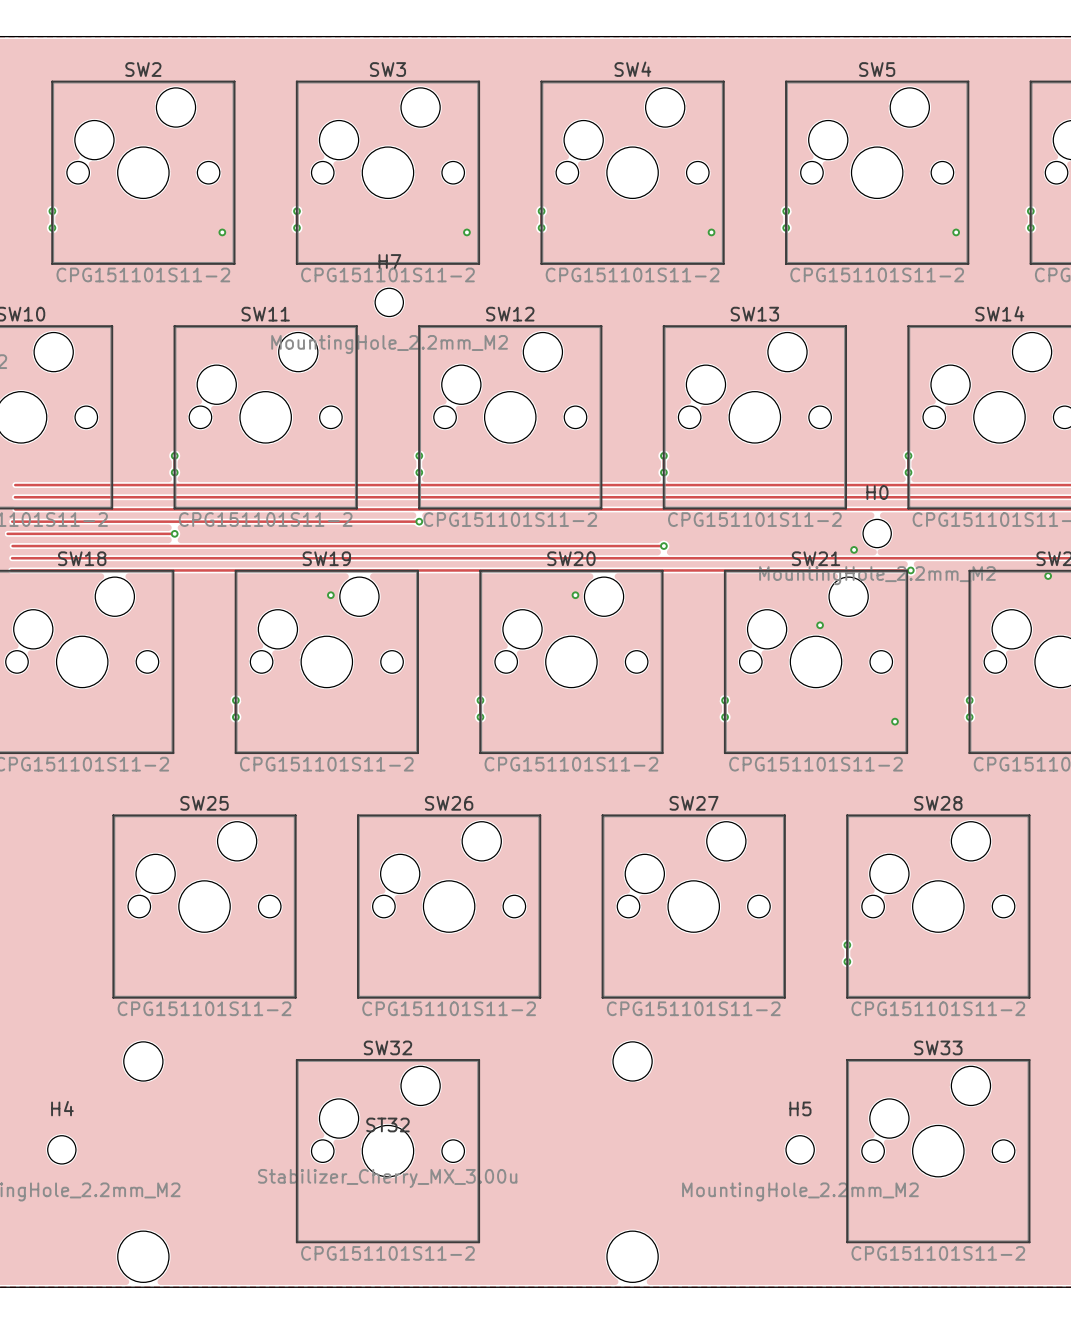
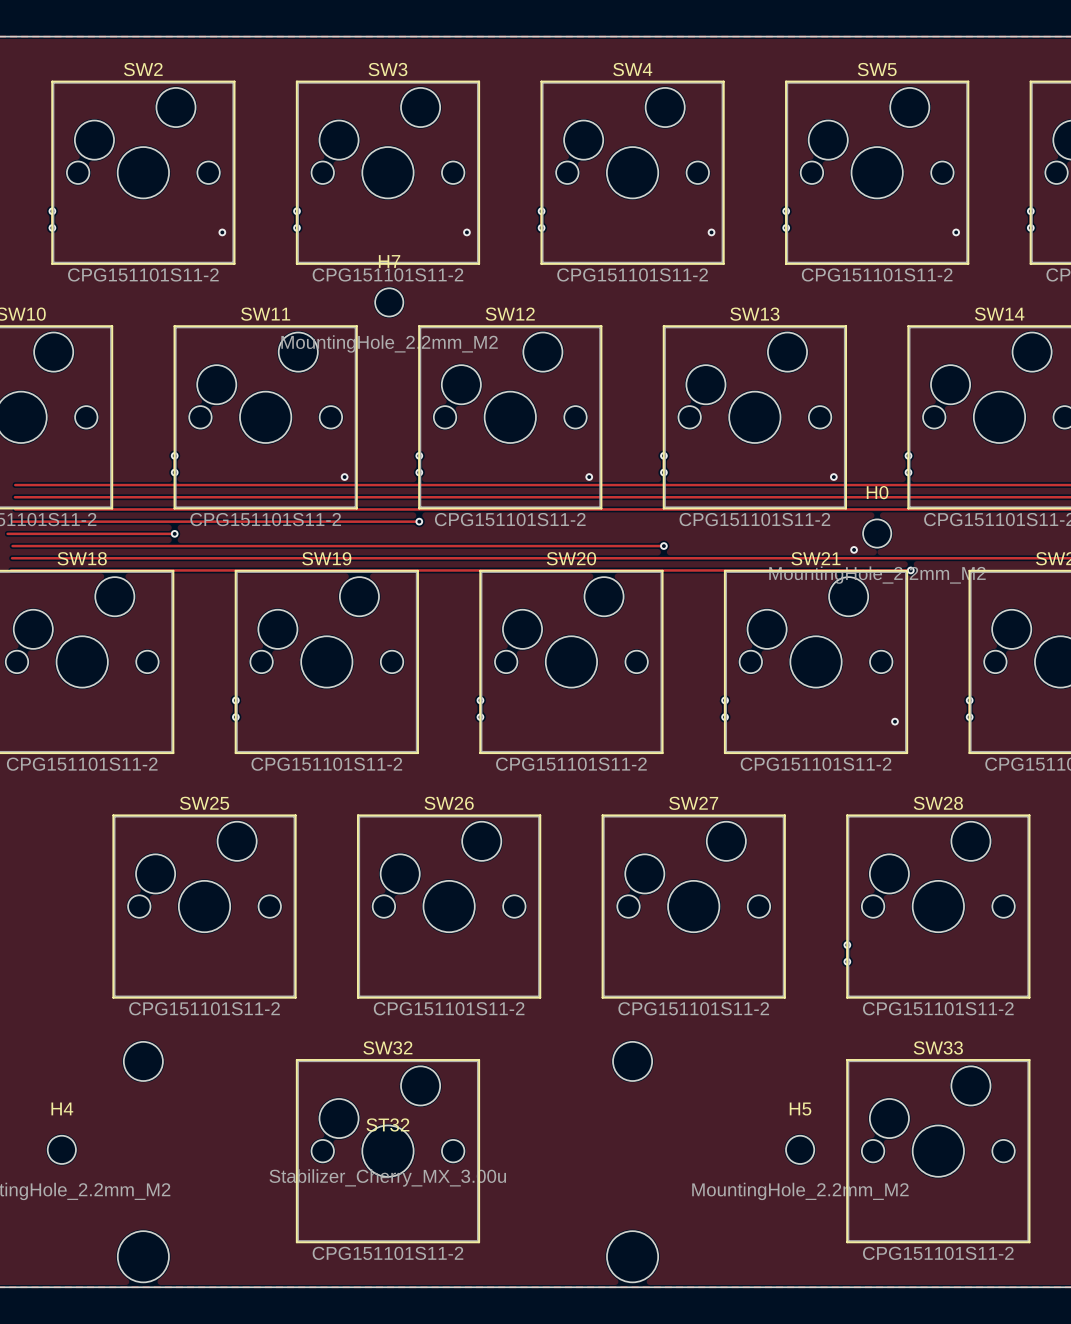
via: none -> (344, 477)
via: none -> (589, 477)
via: none -> (833, 477)
via: (1048, 576) -> none
via: (330, 595) -> none
via: (575, 595) -> none
via: (820, 625) -> none

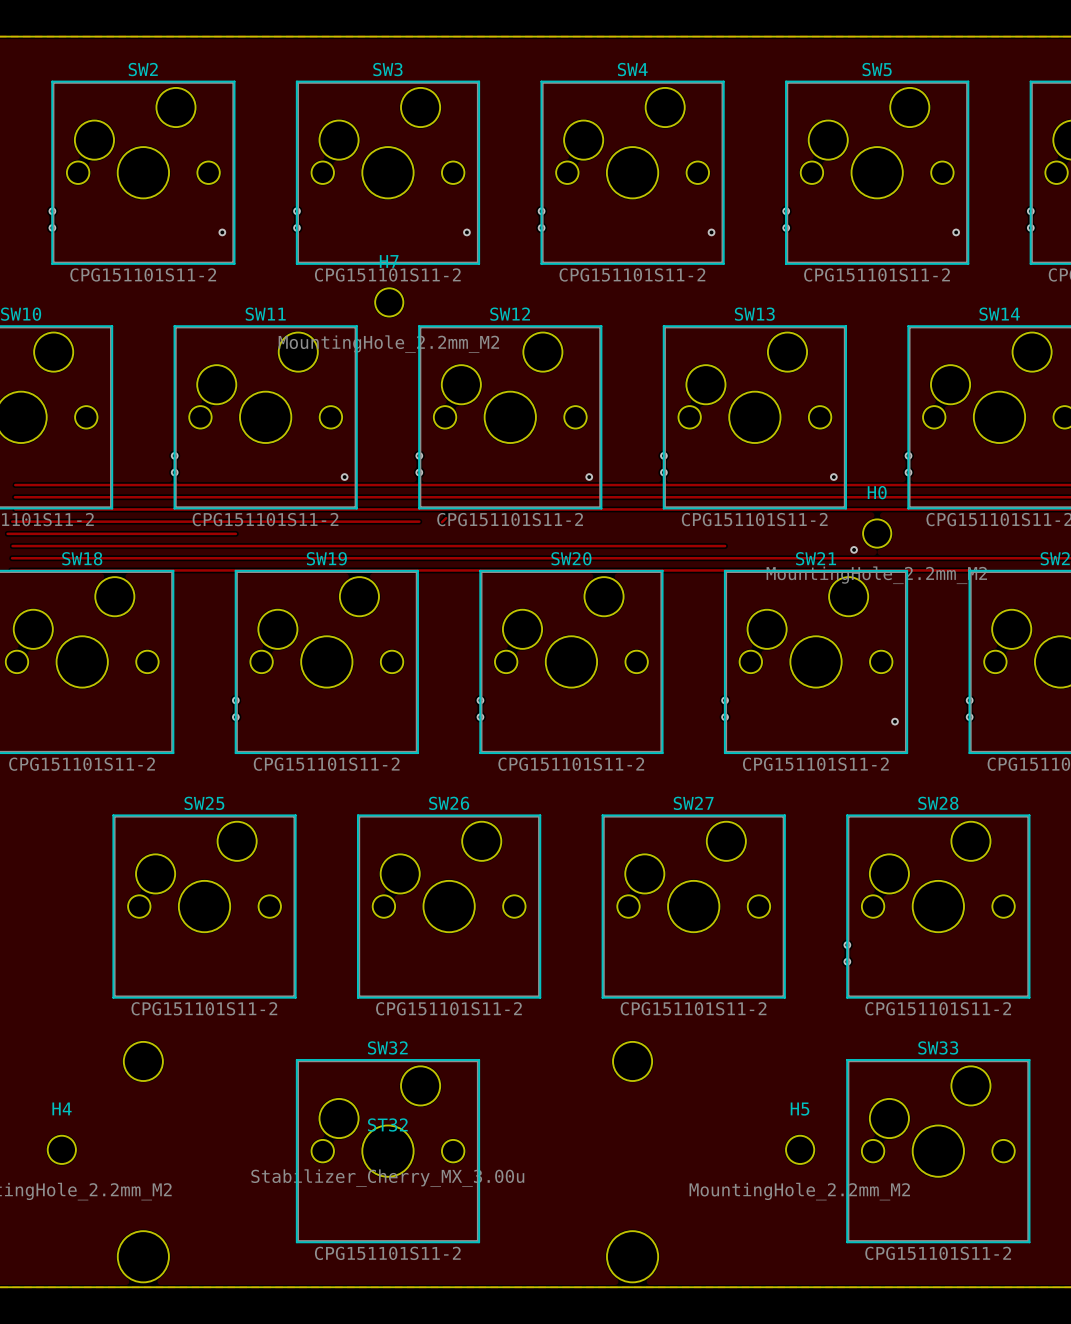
track: none -> (446, 518) (441, 522)
via: (419, 521) -> none
track: none -> (174, 533) (235, 533)
via: (174, 533) -> none
track: none -> (663, 546) (725, 546)
via: (663, 546) -> none
track: none -> (910, 570) (969, 570)
via: (910, 570) -> none

